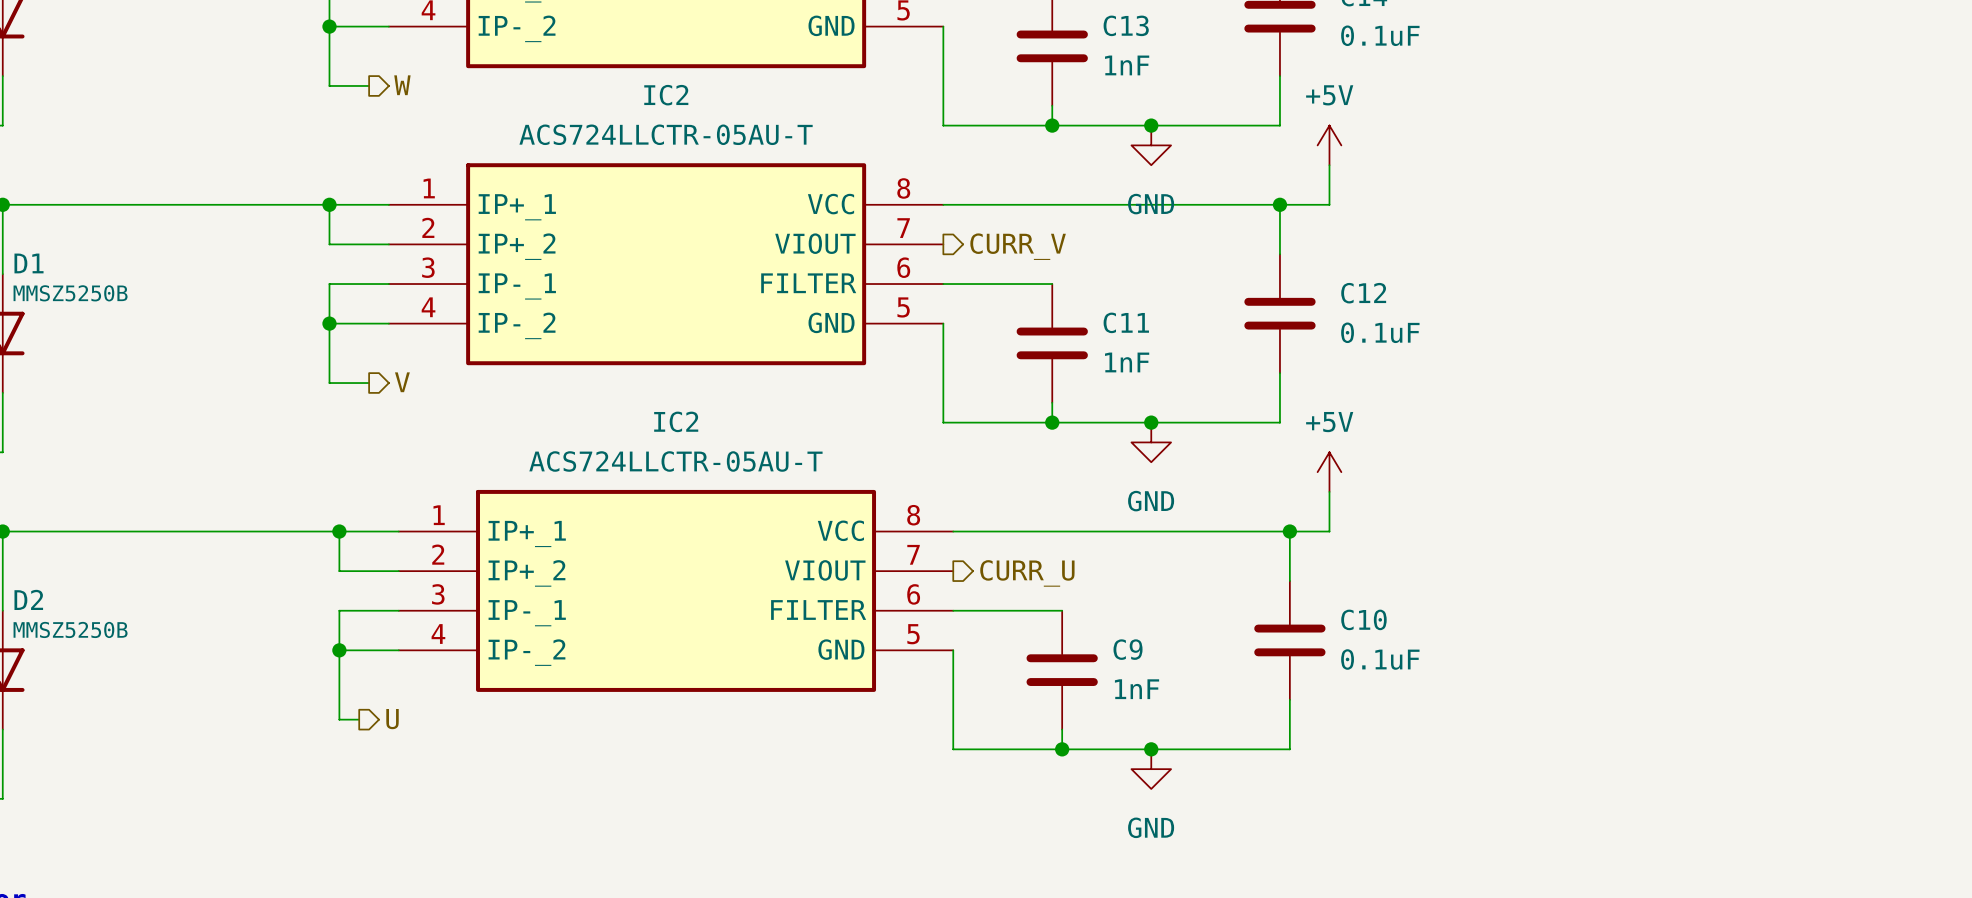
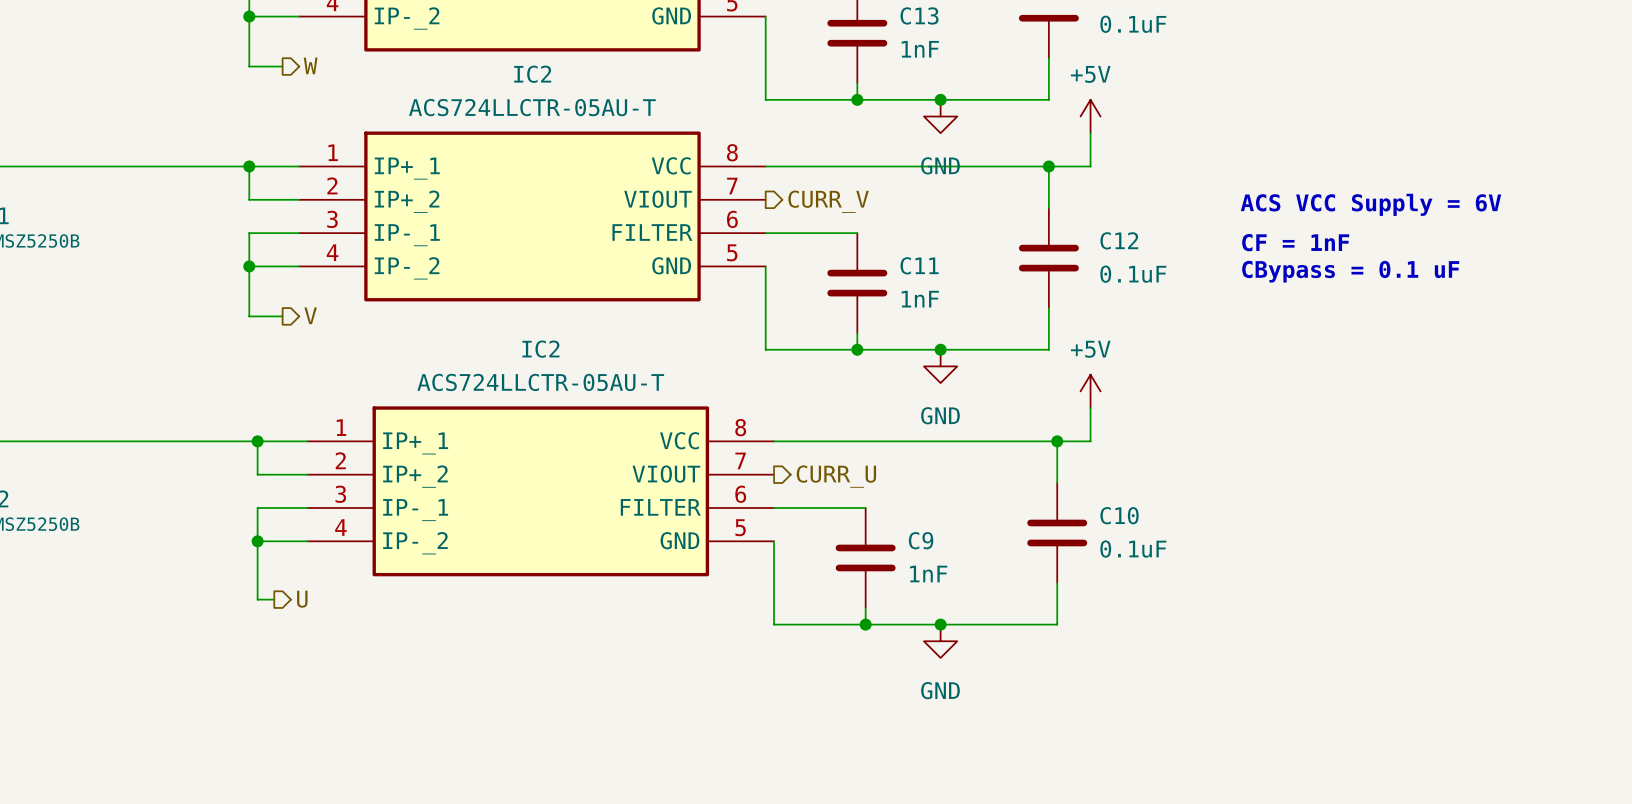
text: none -> ACS VCC Supply = 6V (1371, 204)
text: none -> CF = 1nF (1295, 242)
text: none -> CBypass = 0.1 uF (1350, 271)

